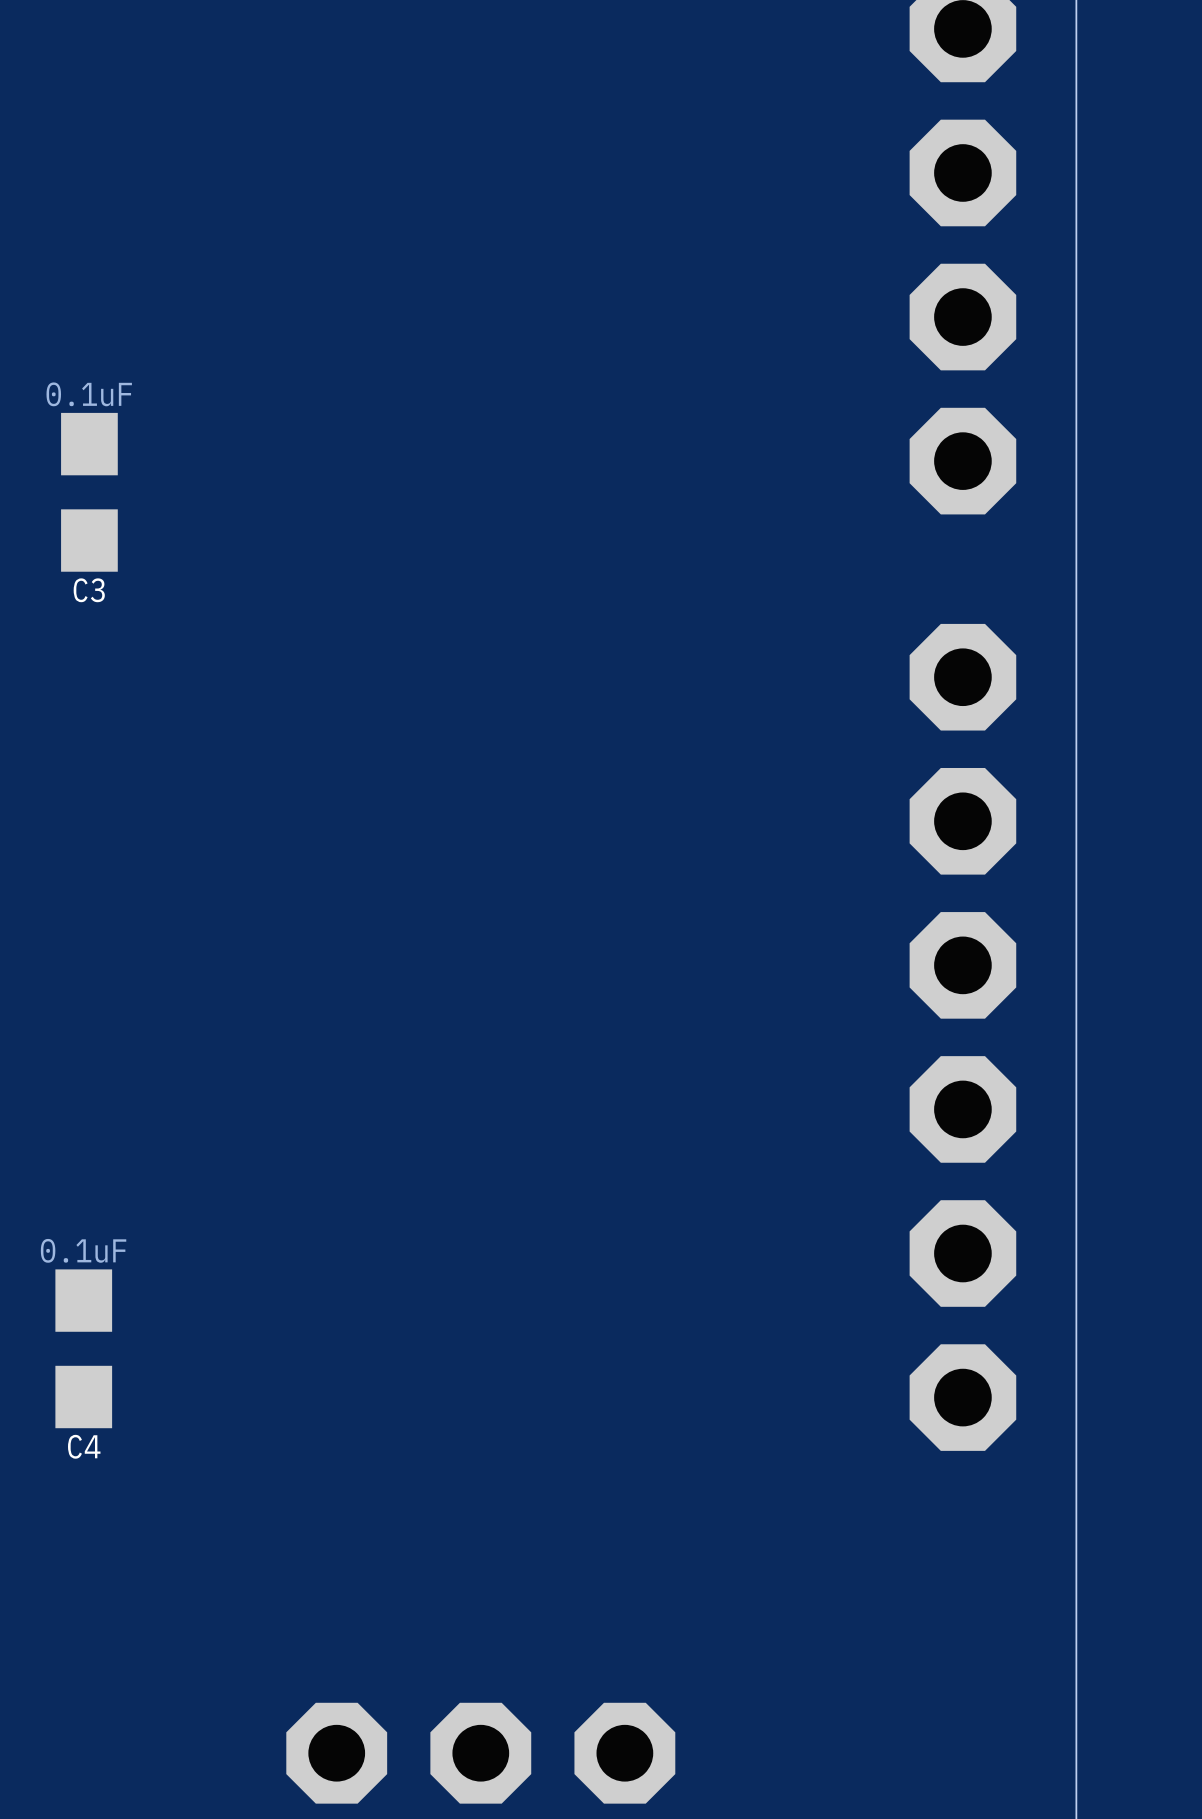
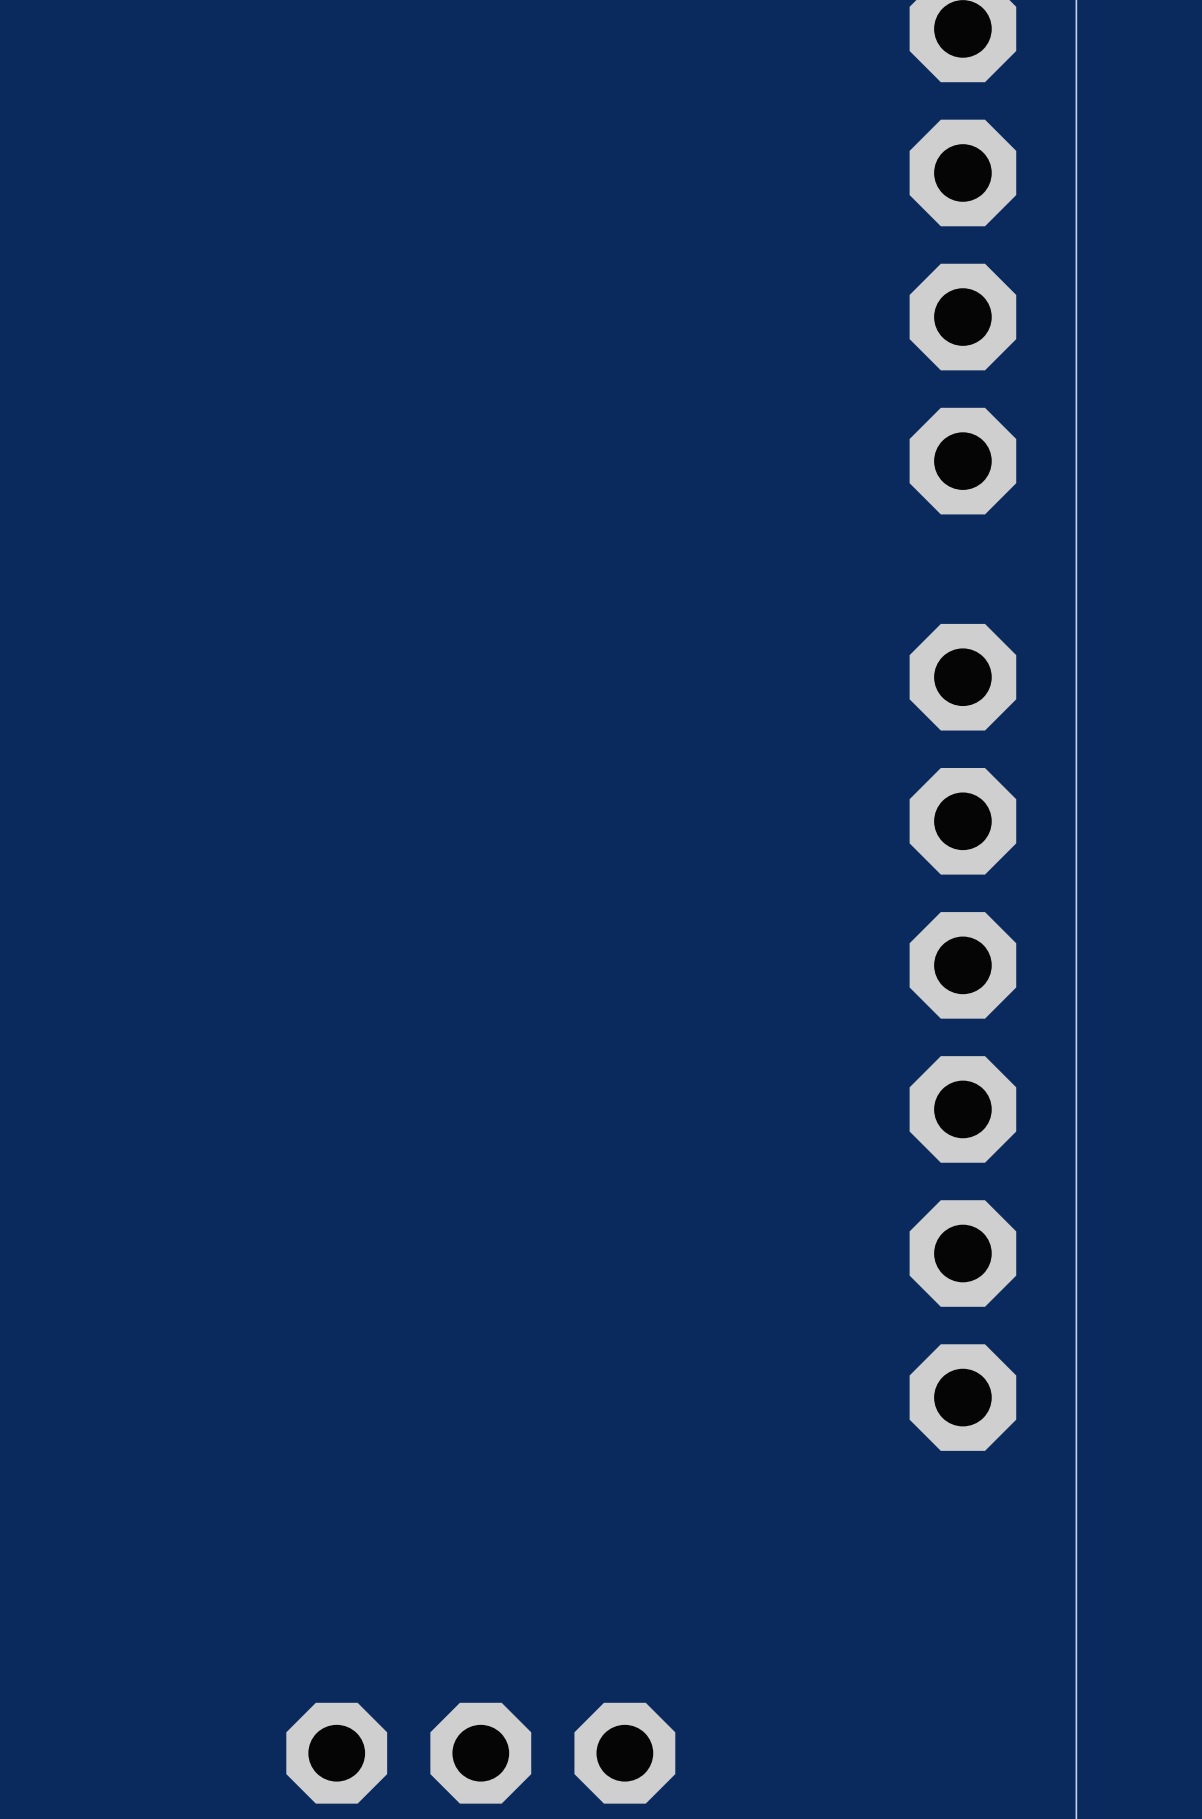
C3: 0.1uF (89, 492) -> none
C4: 0.1uF (83, 1348) -> none

